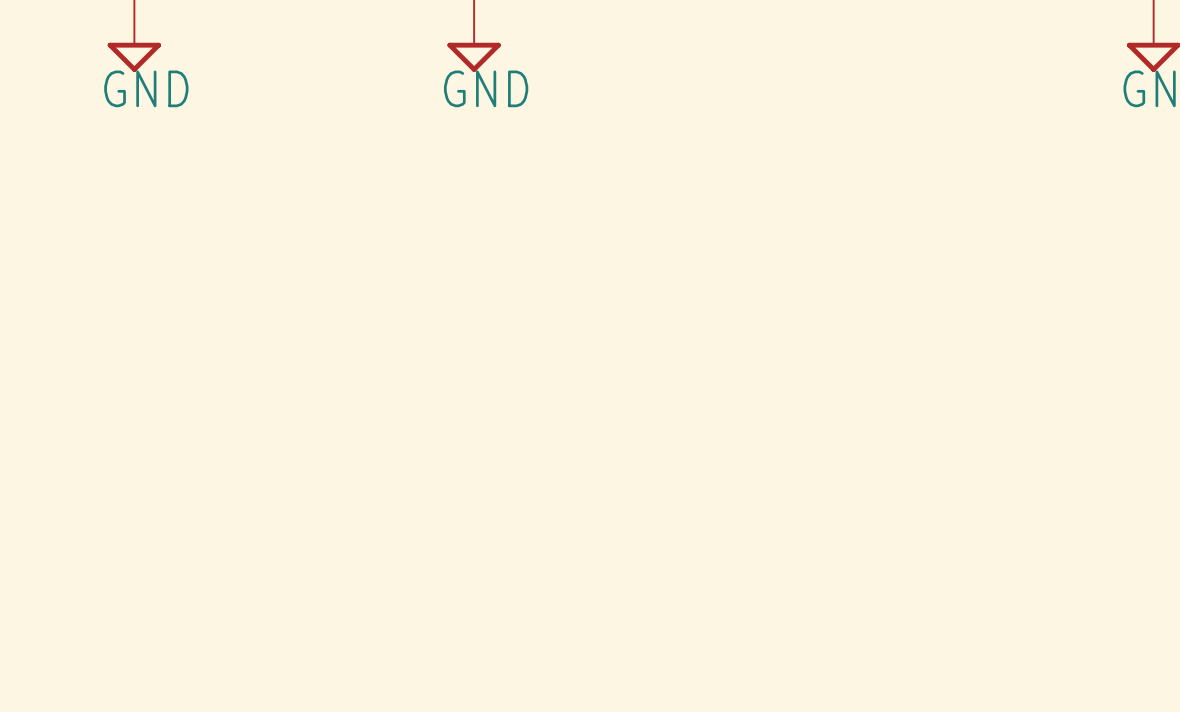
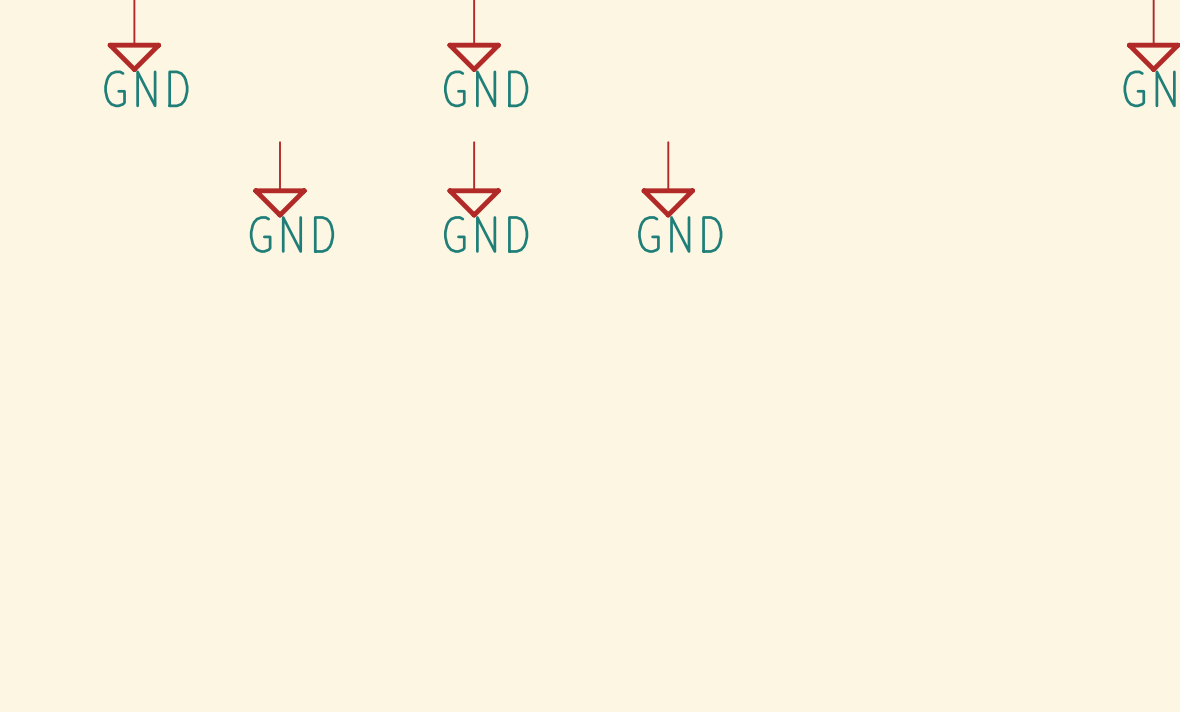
power symbol: none -> GND (279, 179)
power symbol: none -> GND (474, 179)
power symbol: none -> GND (668, 179)

